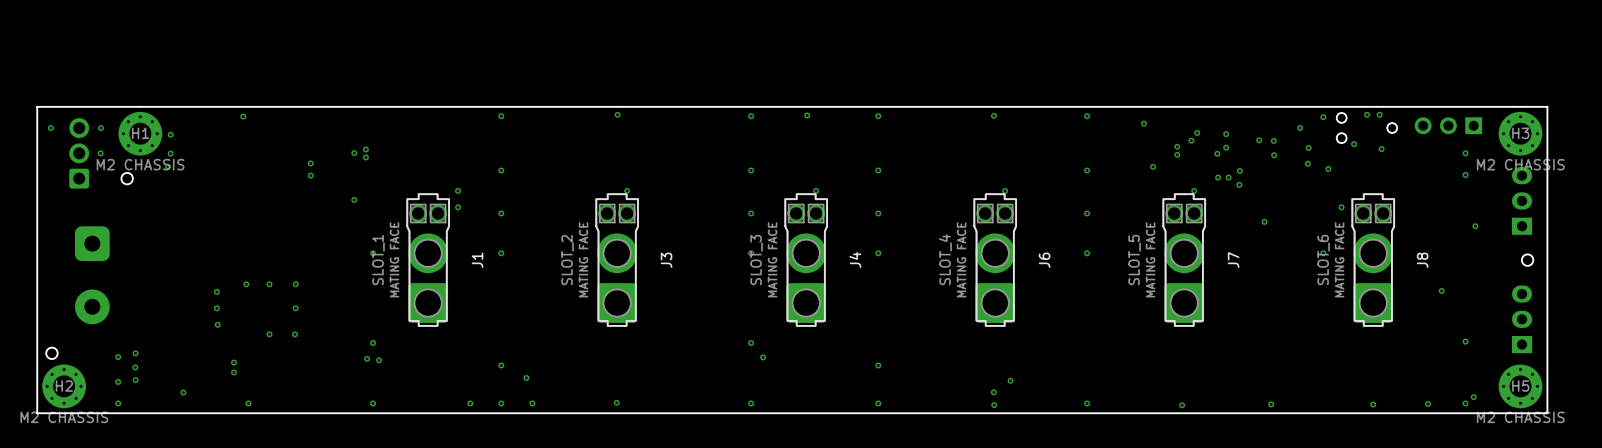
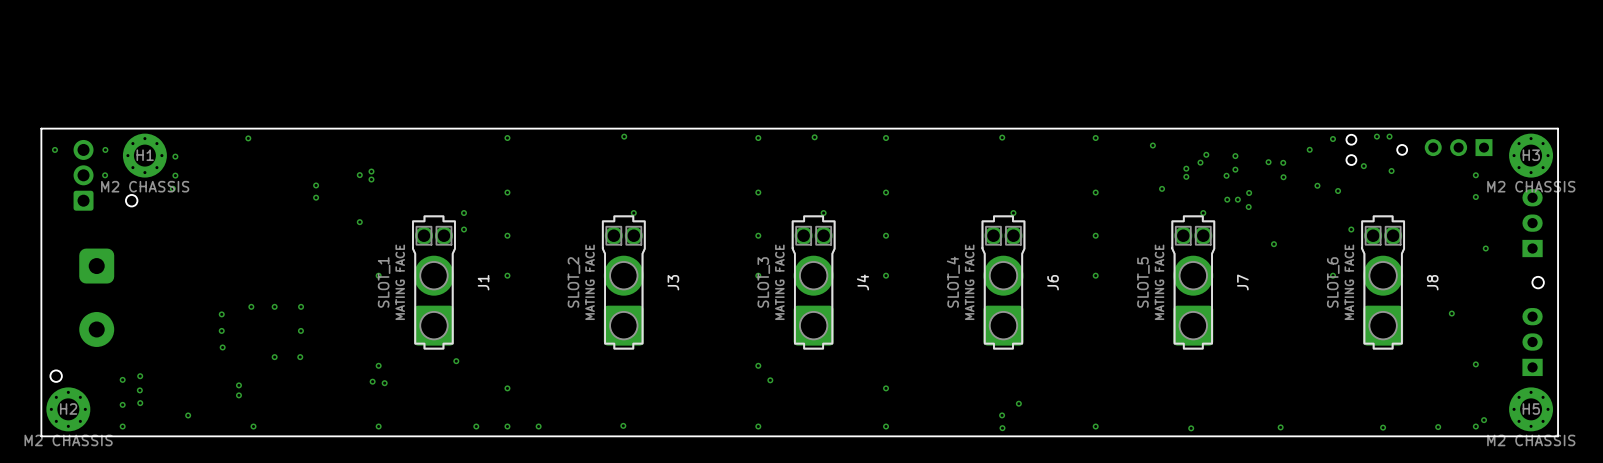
via: (1308, 147) -> none
via: none -> (456, 361)
via: (526, 378) -> none

